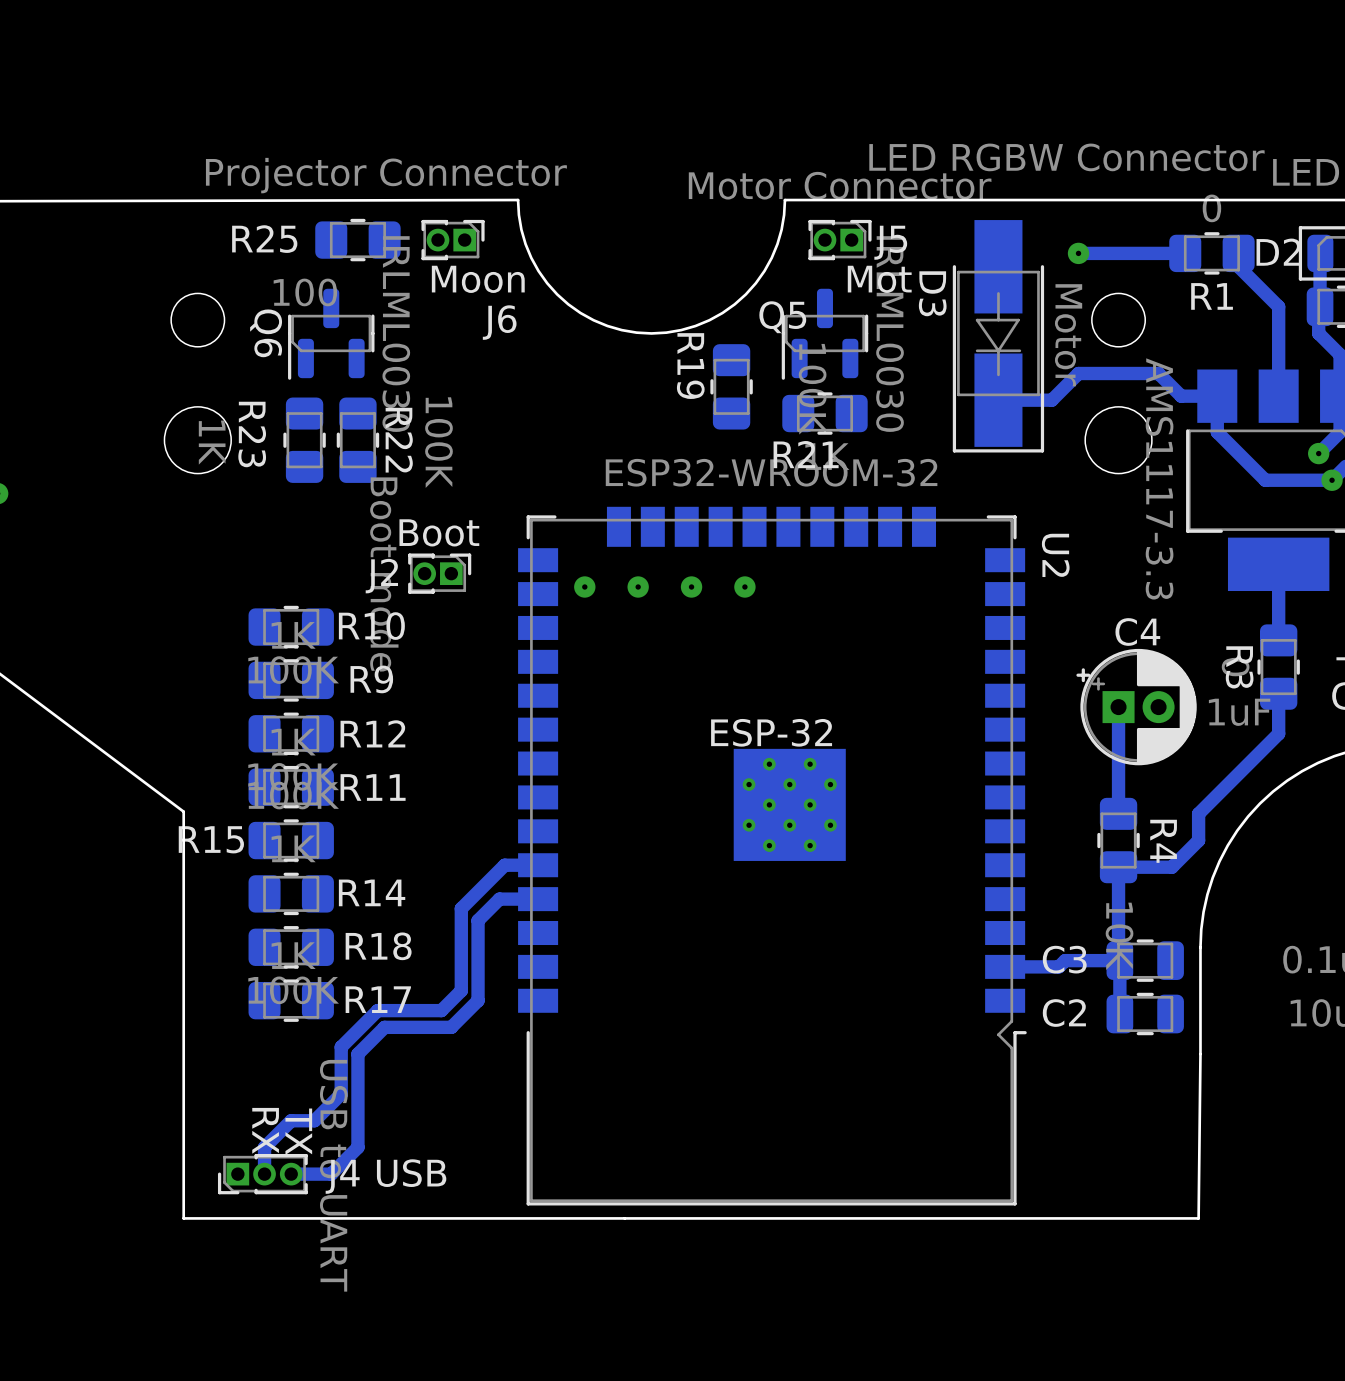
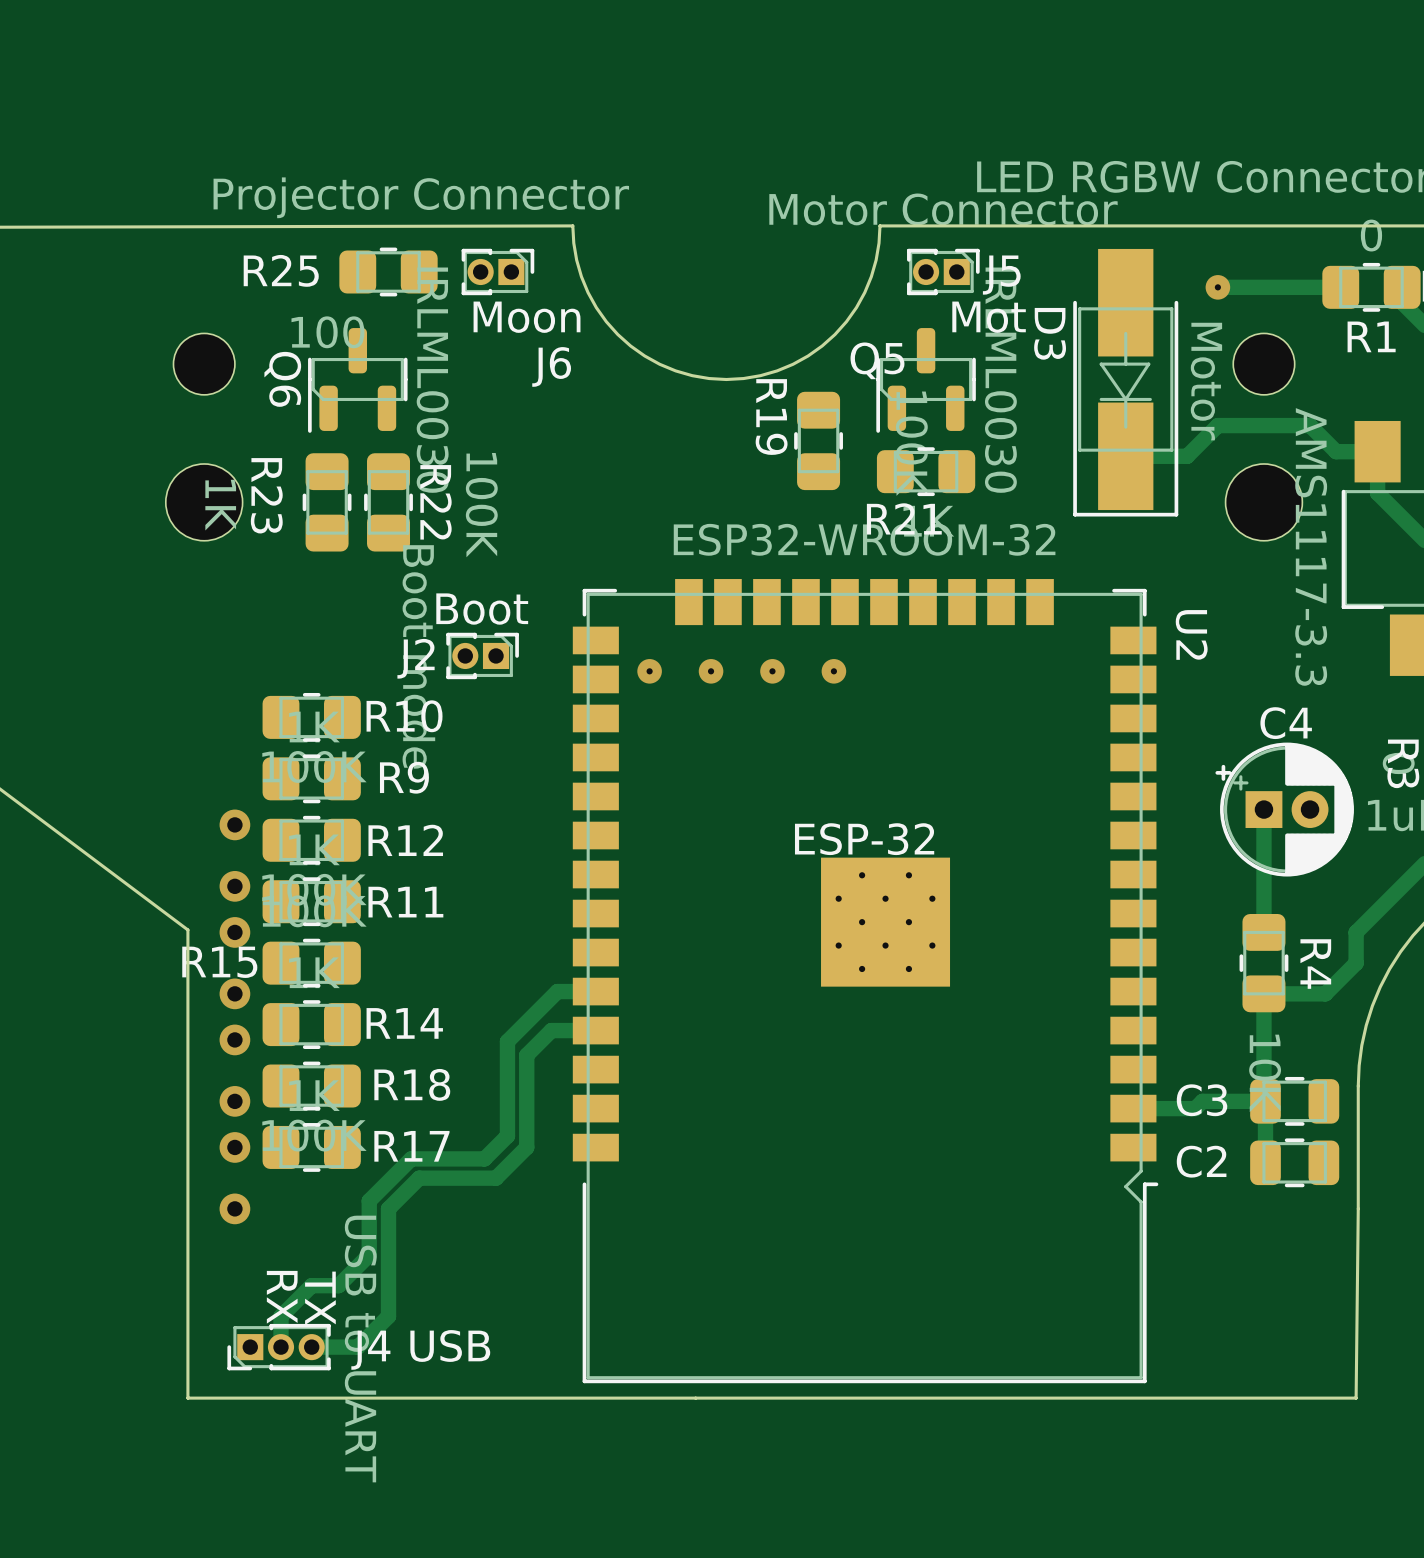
via: none -> (234, 824)
via: none -> (234, 886)
via: none -> (234, 932)
via: none -> (234, 993)
via: none -> (234, 1039)
via: none -> (234, 1101)
via: none -> (234, 1147)
via: none -> (234, 1208)

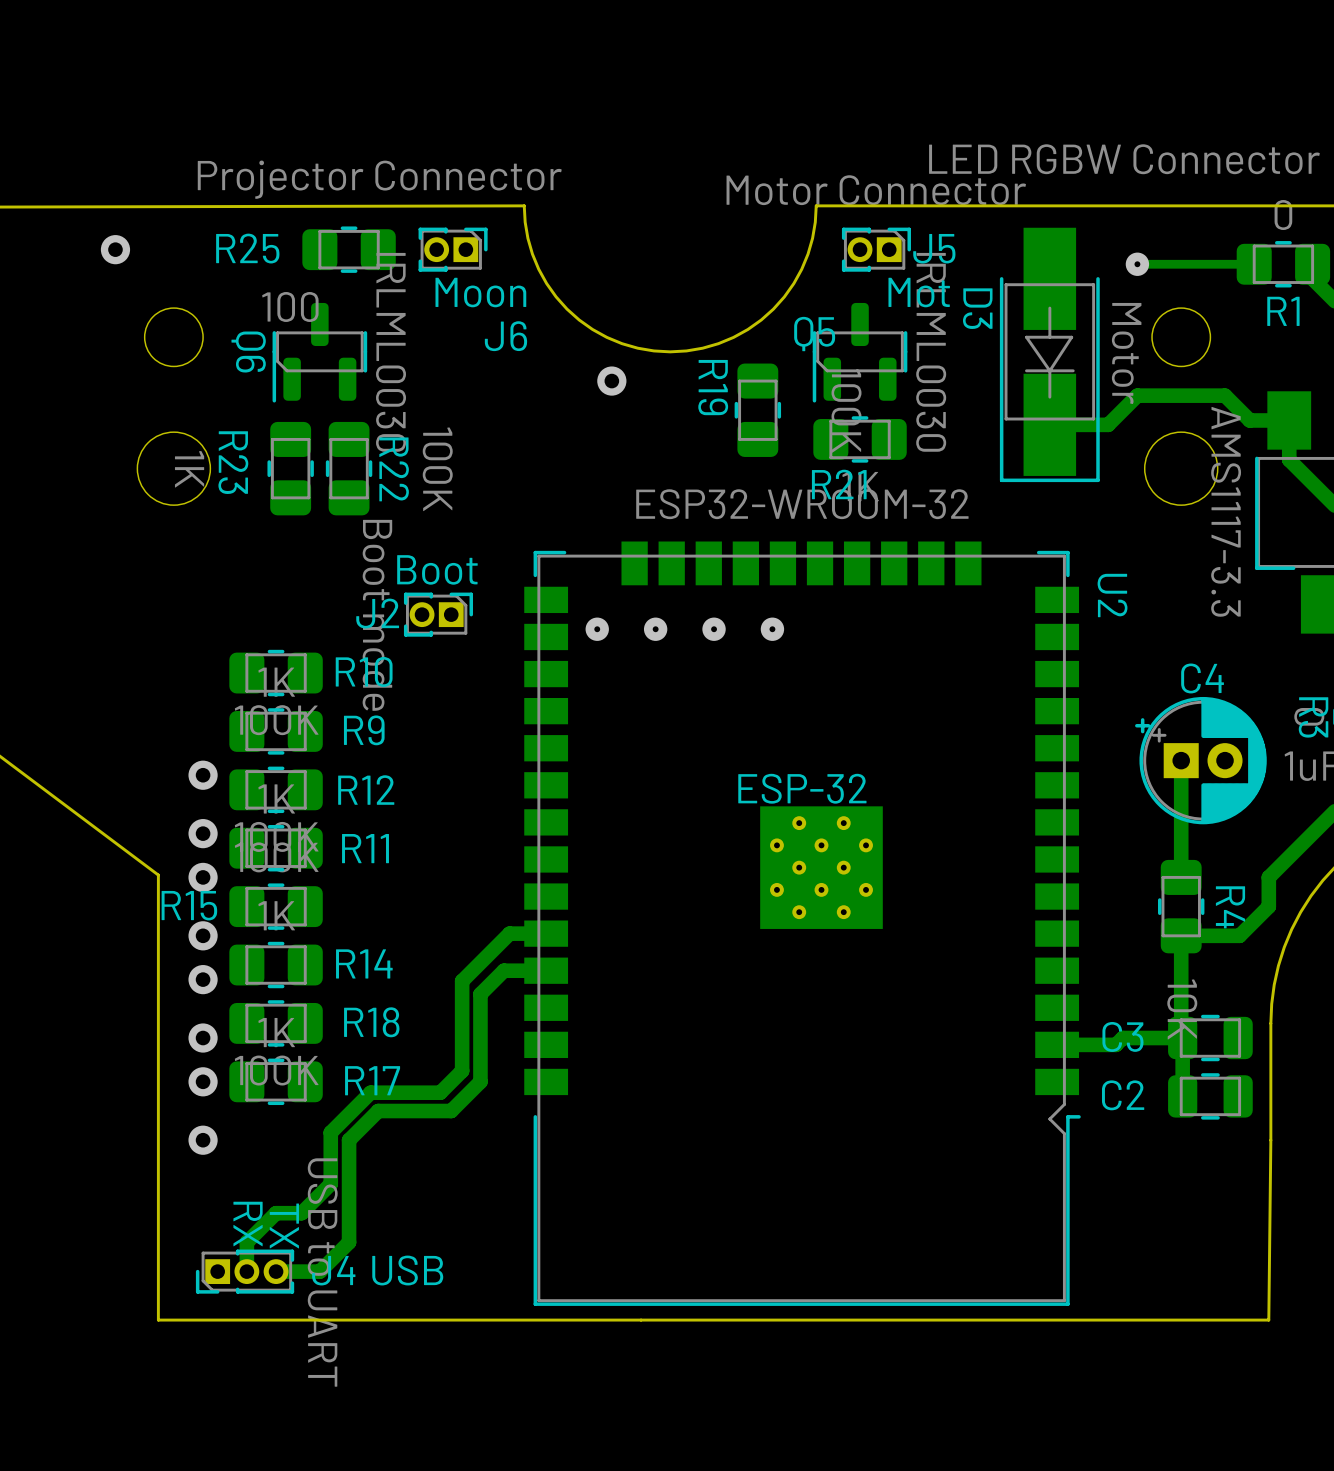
via: none -> (115, 249)
track width: thick (1340, 287) (1217, 287) -> thin (1254, 264) (1137, 264)
via: none -> (611, 381)

